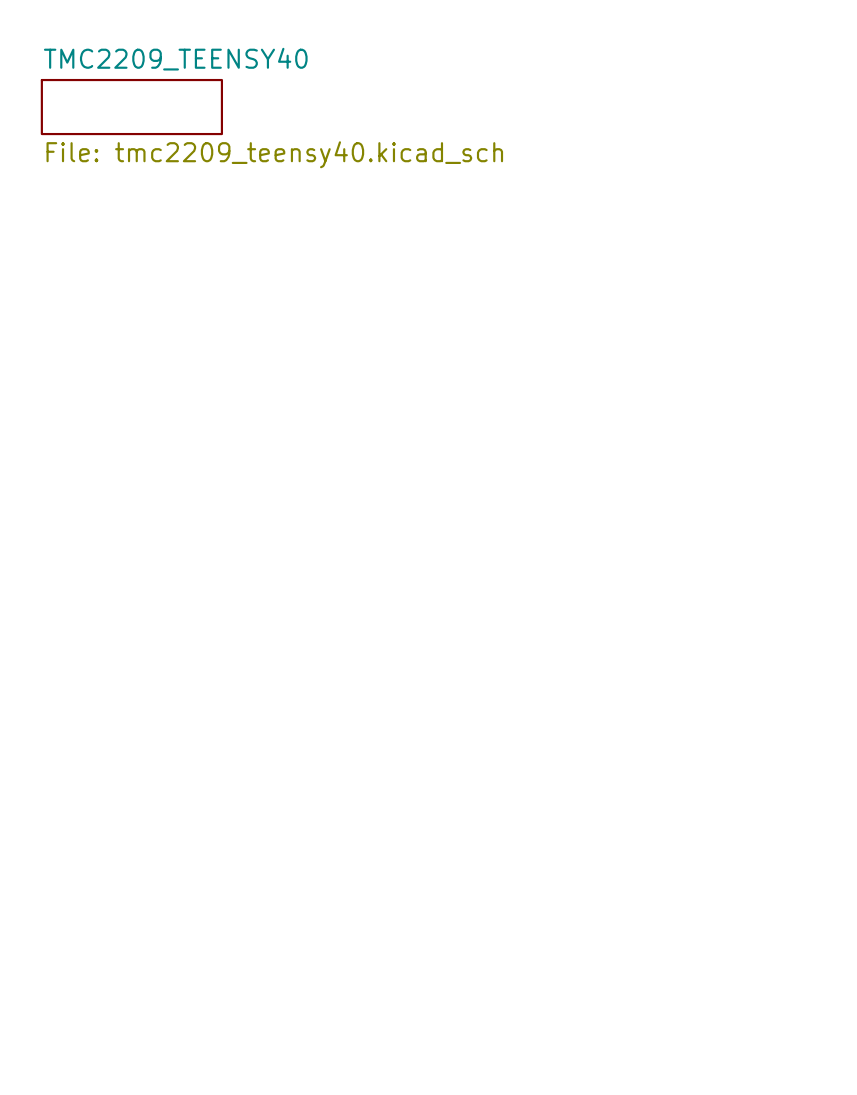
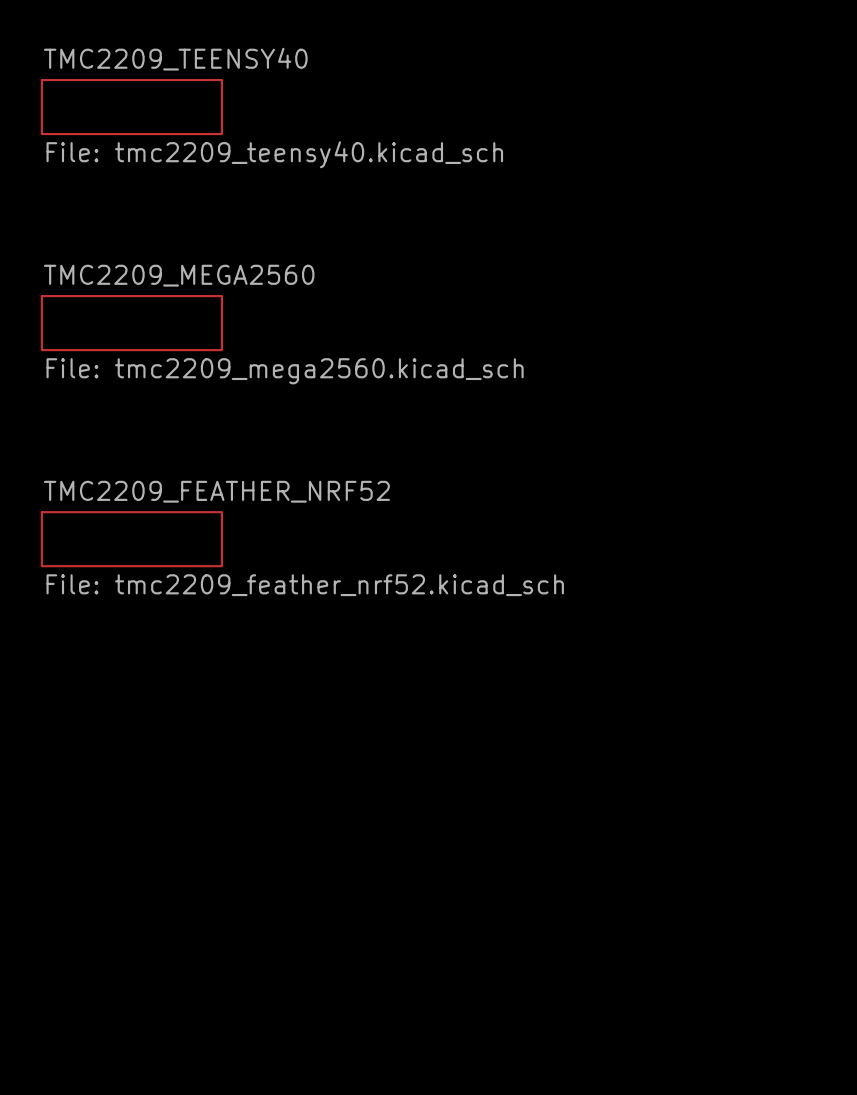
sheet TMC2209_MEGA2560: none -> File: tmc2209_mega2560.kicad_sch (131, 323)
sheet TMC2209_FEATHER_NRF52: none -> File: tmc2209_feather_nrf52.kicad_sch (131, 539)

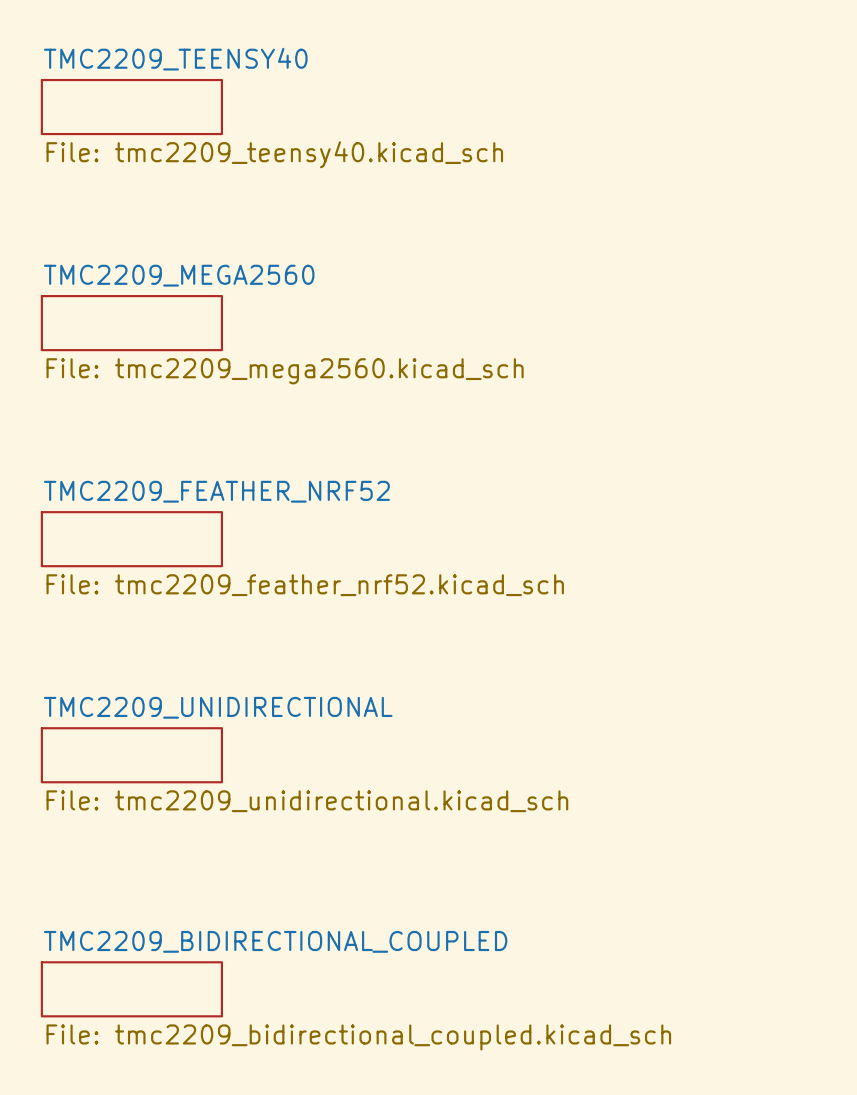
sheet TMC2209_UNIDIRECTIONAL: none -> File: tmc2209_unidirectional.kicad_sch (131, 755)
sheet TMC2209_BIDIRECTIONAL_COUPLED: none -> File: tmc2209_bidirectional_coupled.kicad_sch (131, 989)

